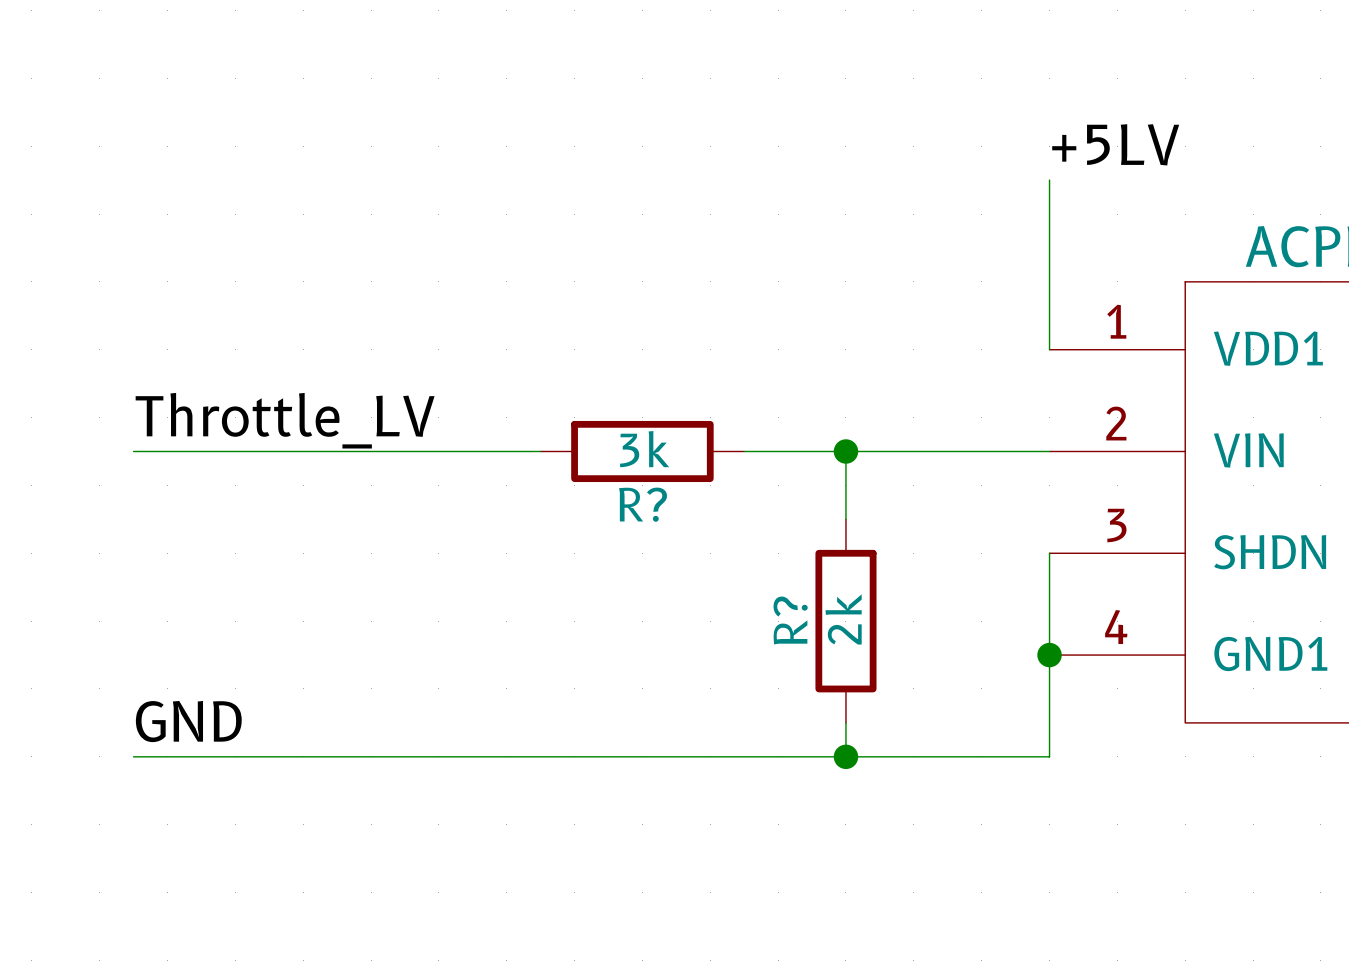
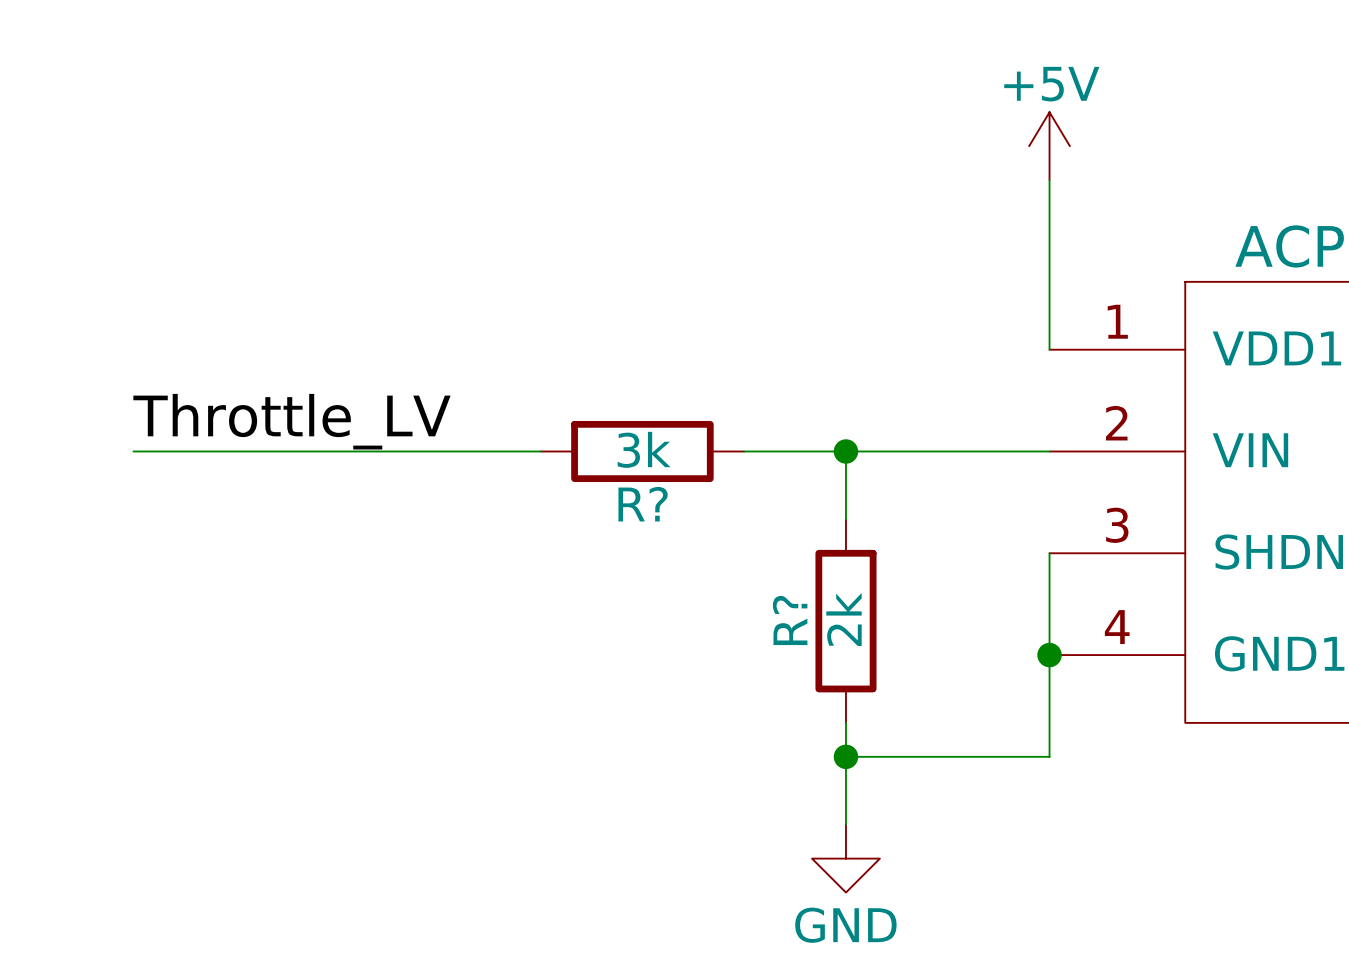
label: +5LV (1115, 144) -> none
power symbol: none -> +5V (1049, 146)
label: GND (188, 721) -> none
wire: (133, 756) (845, 756) -> (845, 824) (845, 756)
power symbol: none -> GND (845, 858)

